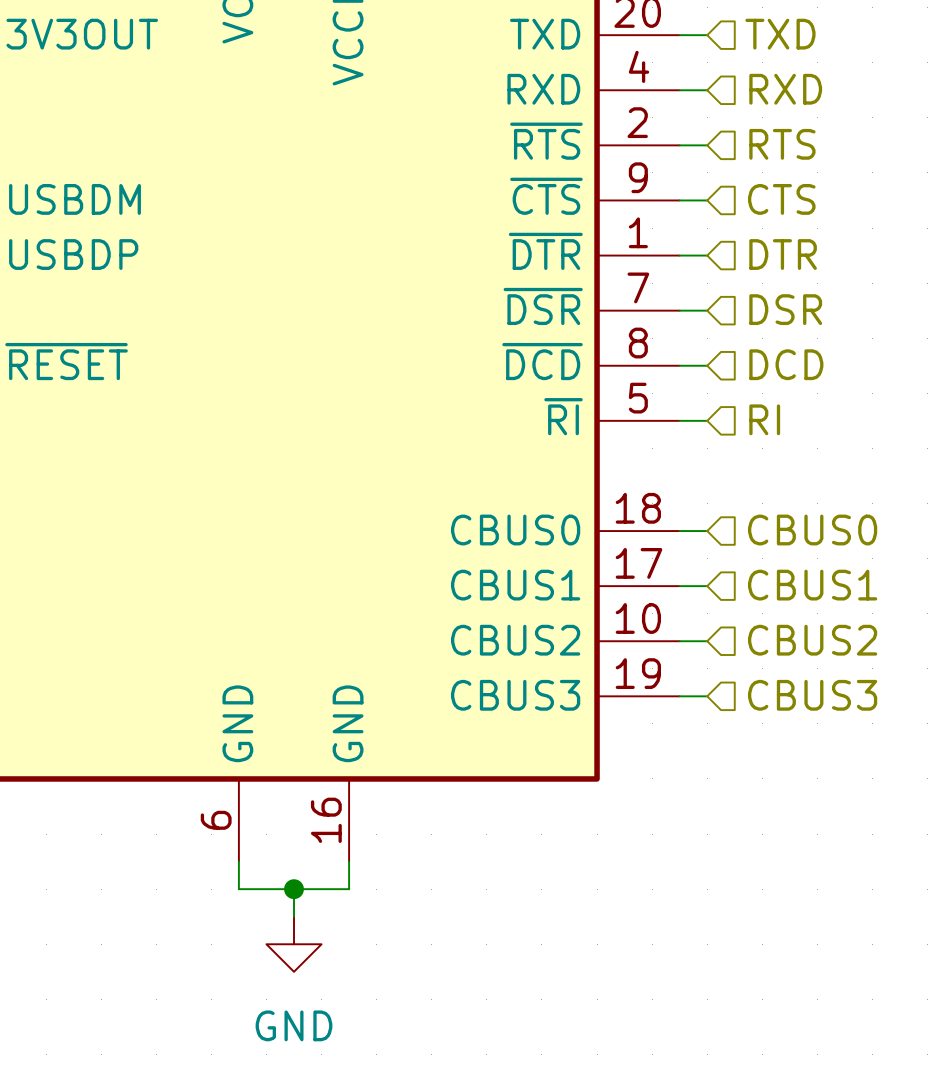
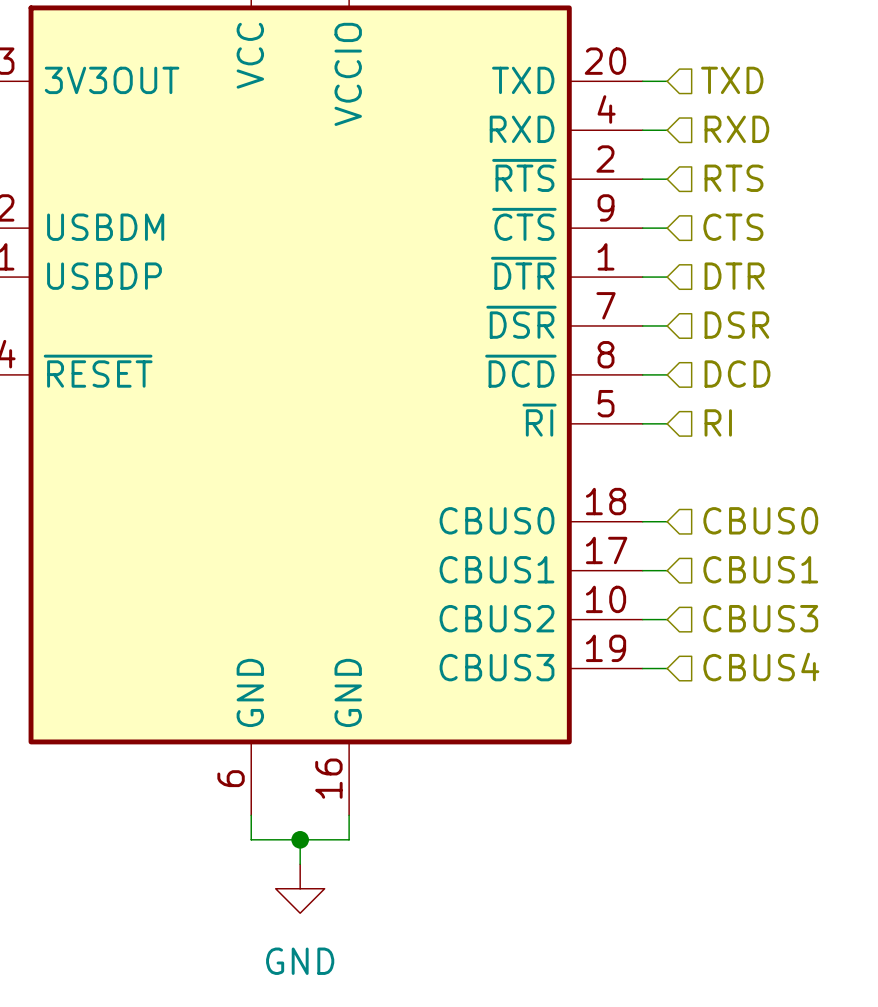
hierarchical label: CBUS2 (812, 640) -> CBUS3 (760, 618)
hierarchical label: CBUS3 (812, 695) -> CBUS4 (761, 667)

